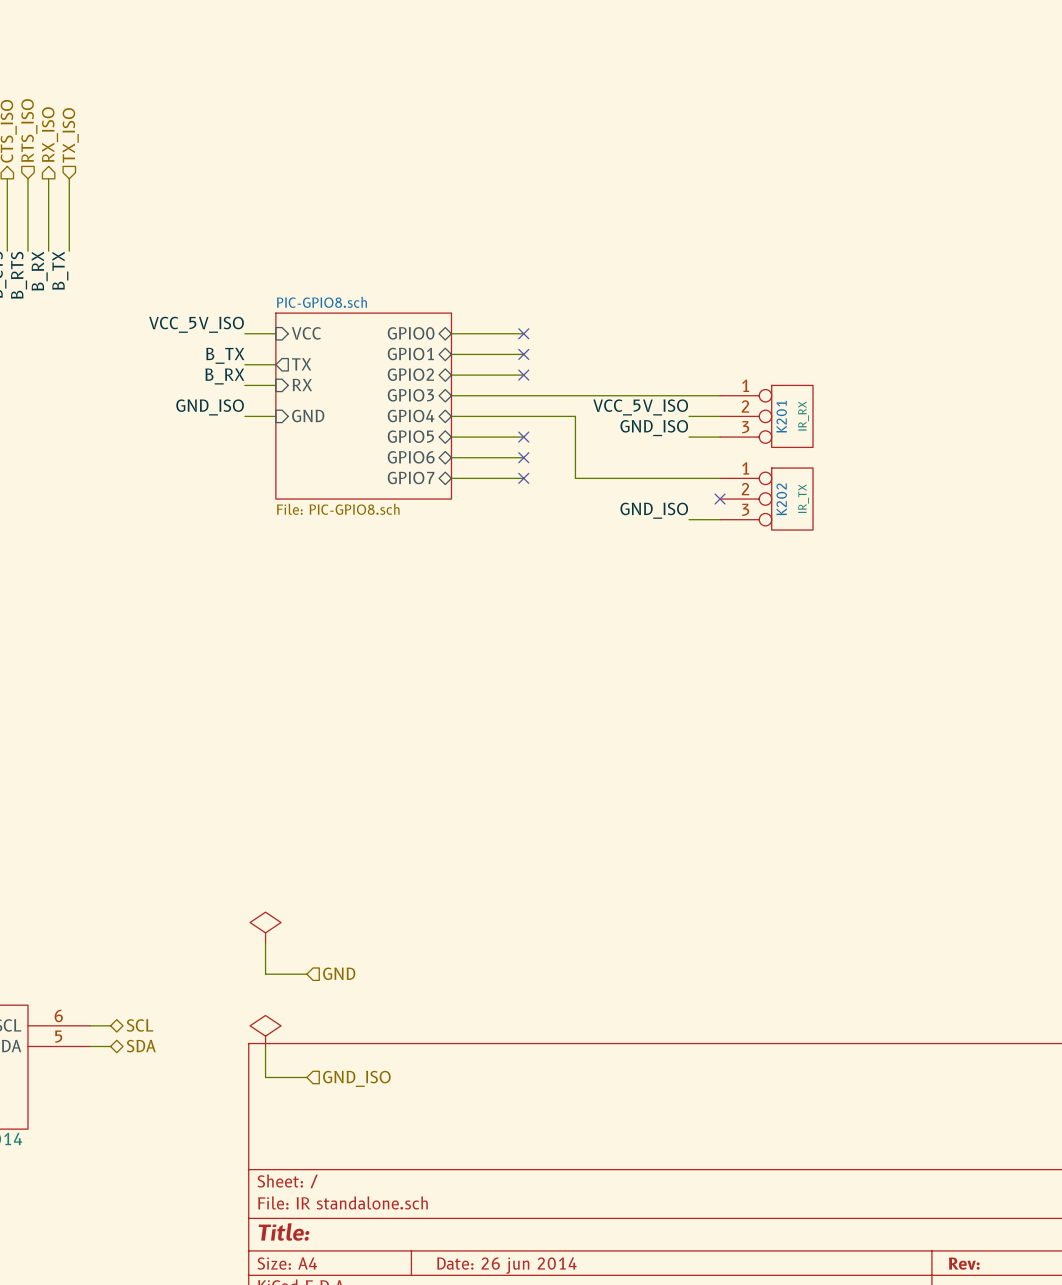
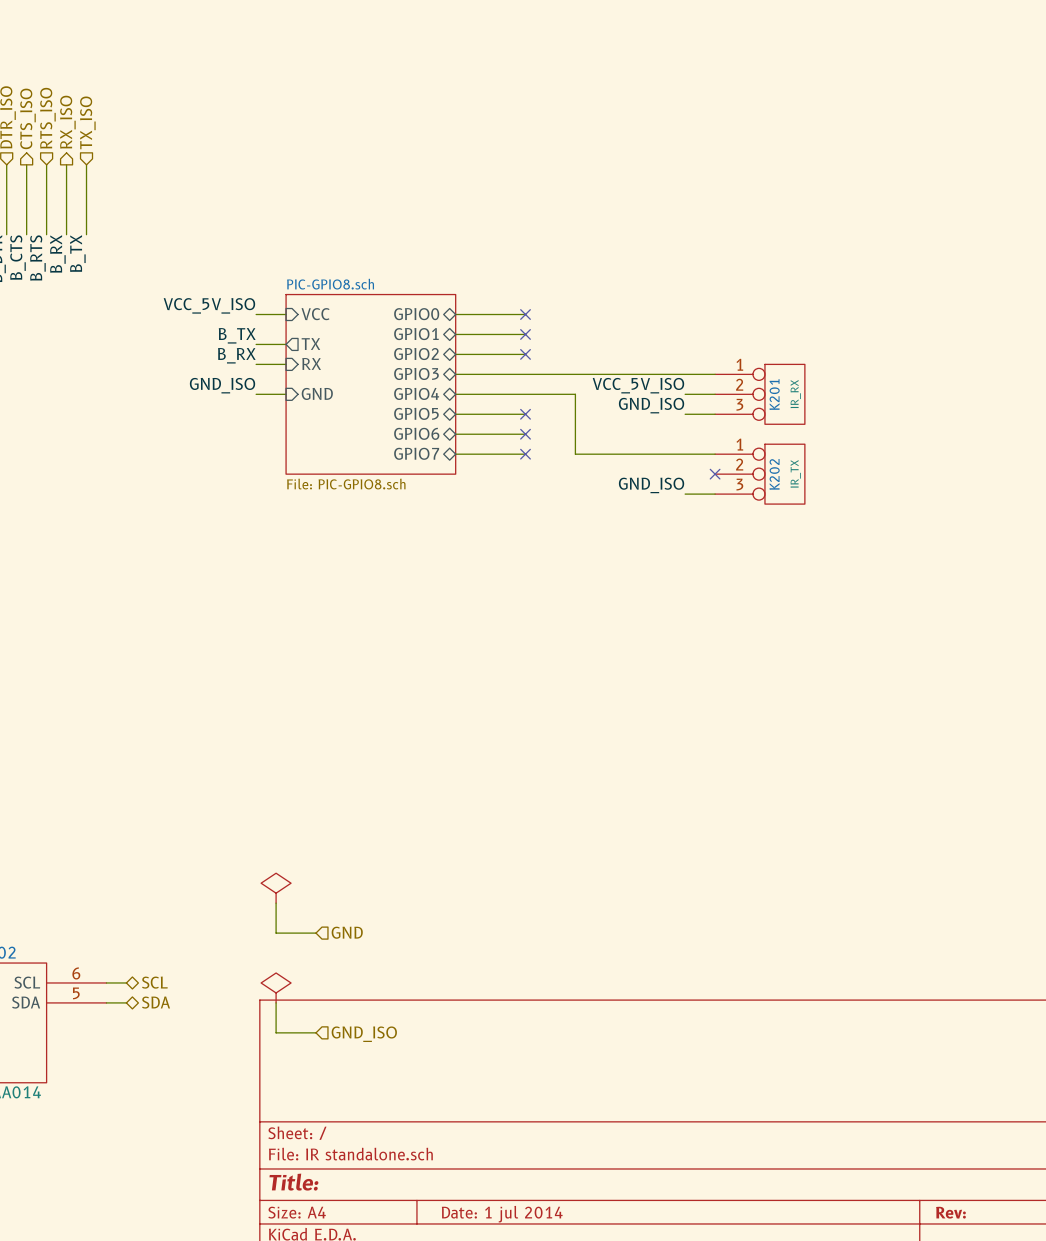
title block: Date: 26 jun 2014 (506, 1265) -> Date: 1 jul 2014 (502, 1214)

